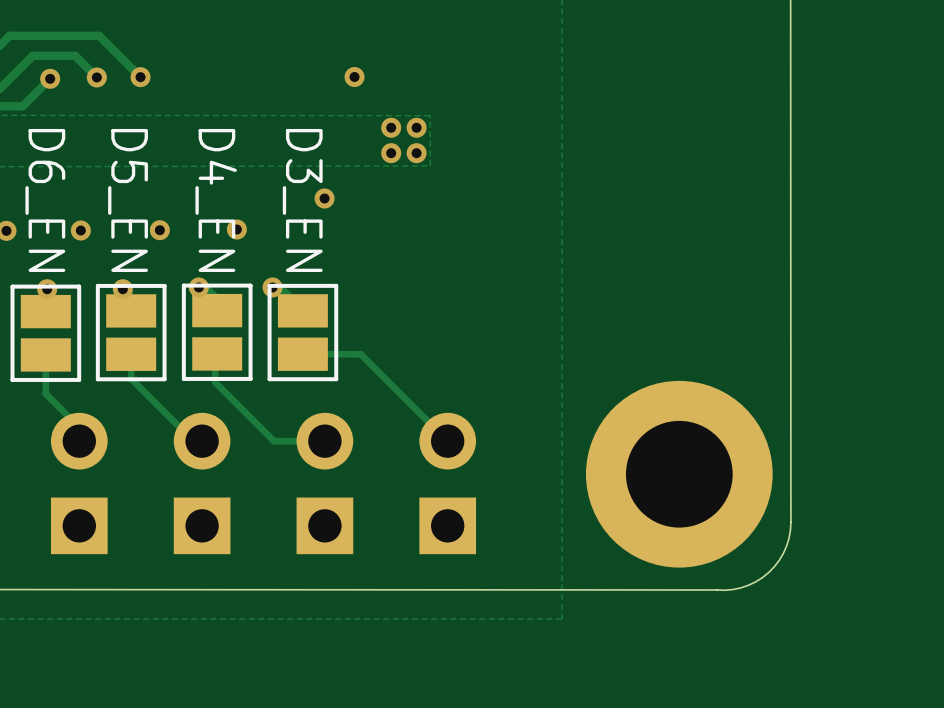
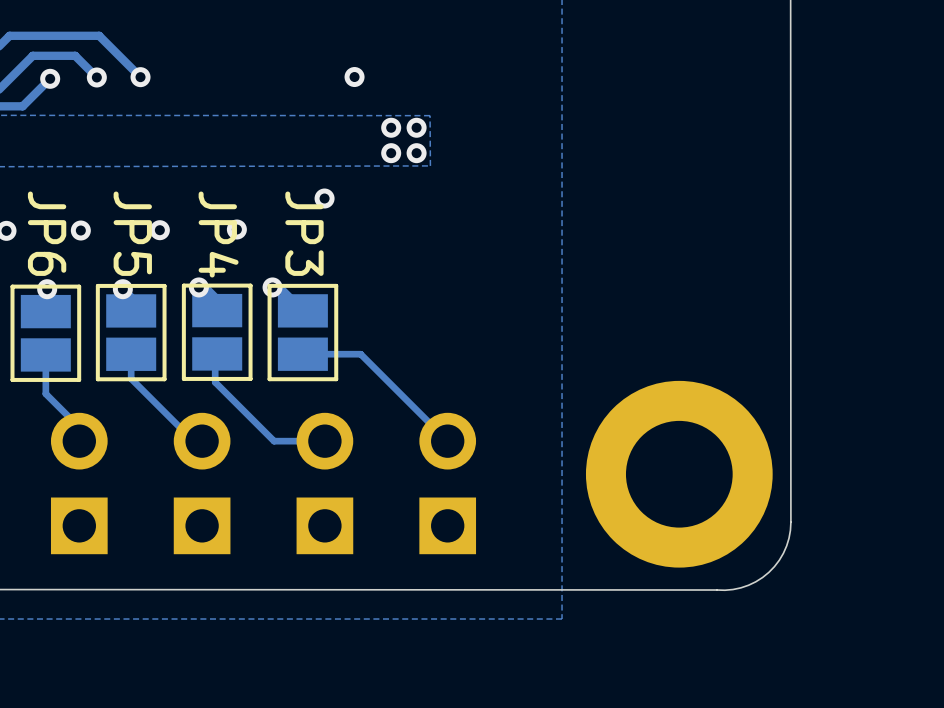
text: D6_EN (45, 200) -> none
text: D5_EN (128, 200) -> none
text: D4_EN (216, 200) -> none
text: D3_EN (302, 200) -> none
JP6 name: none -> JP6 (47, 233)
JP5 name: none -> JP5 (132, 233)
JP3 name: none -> JP3 (304, 233)
JP4 name: none -> JP4 (218, 234)

